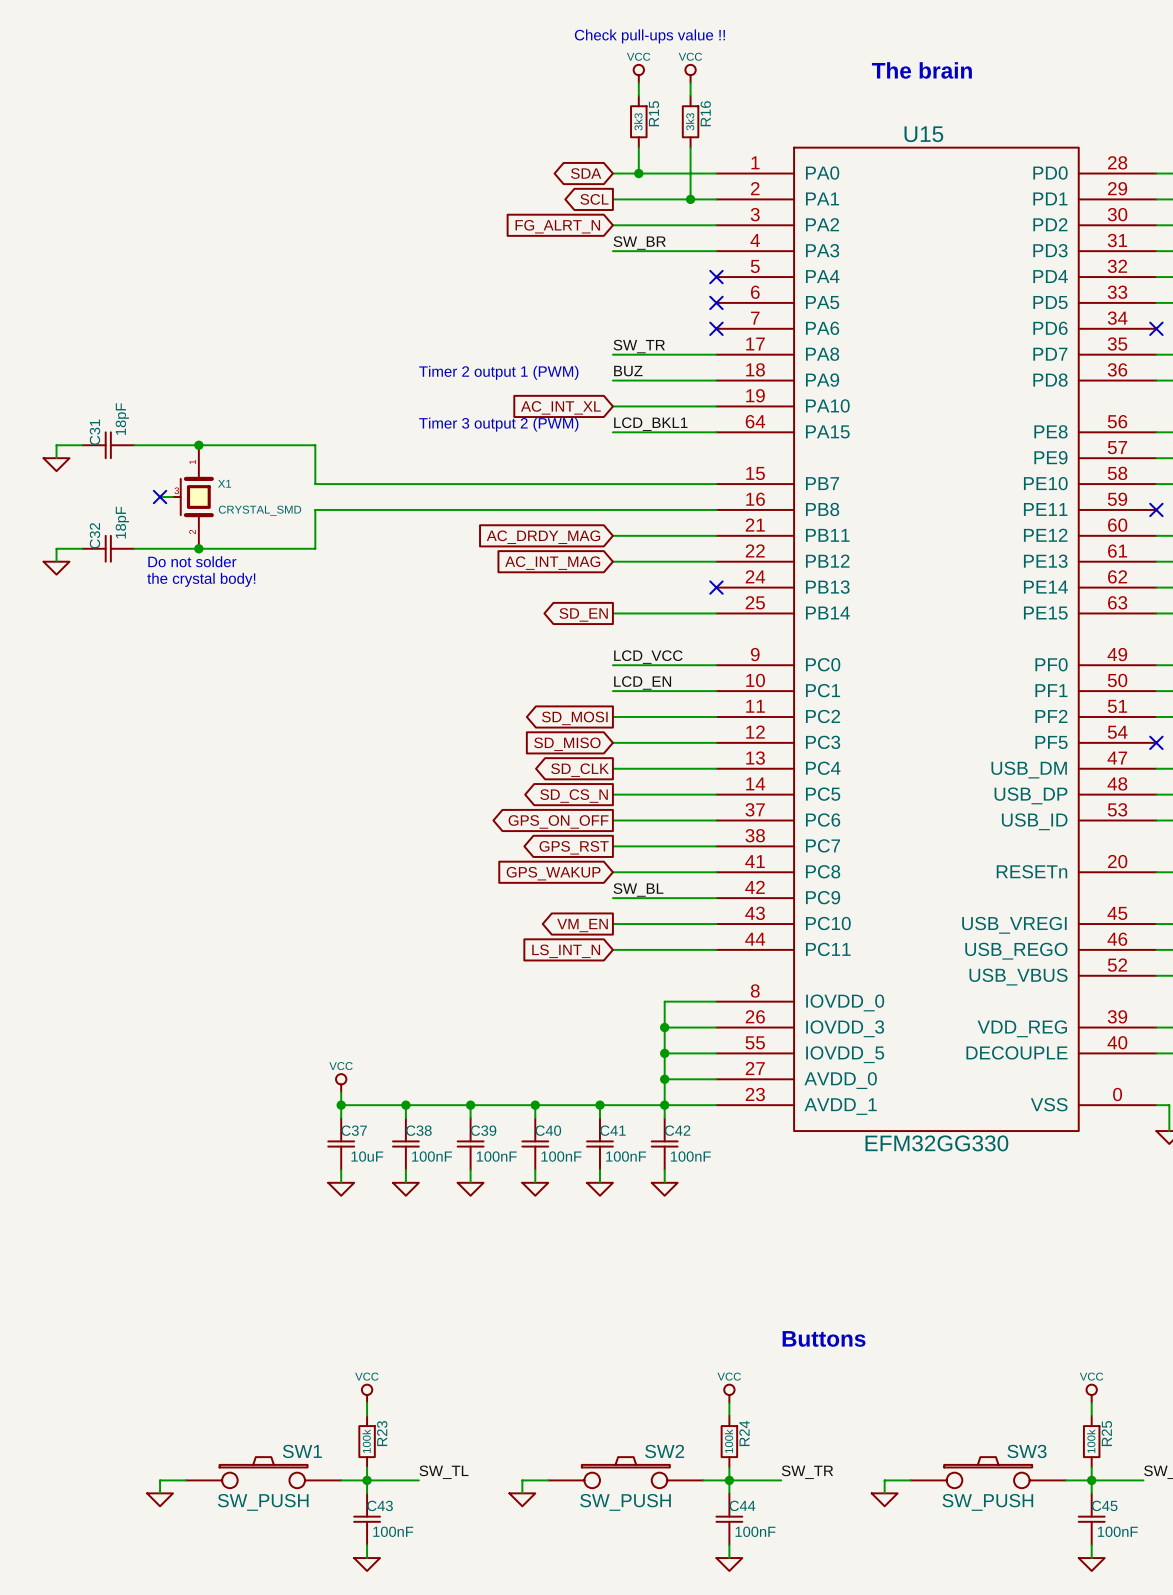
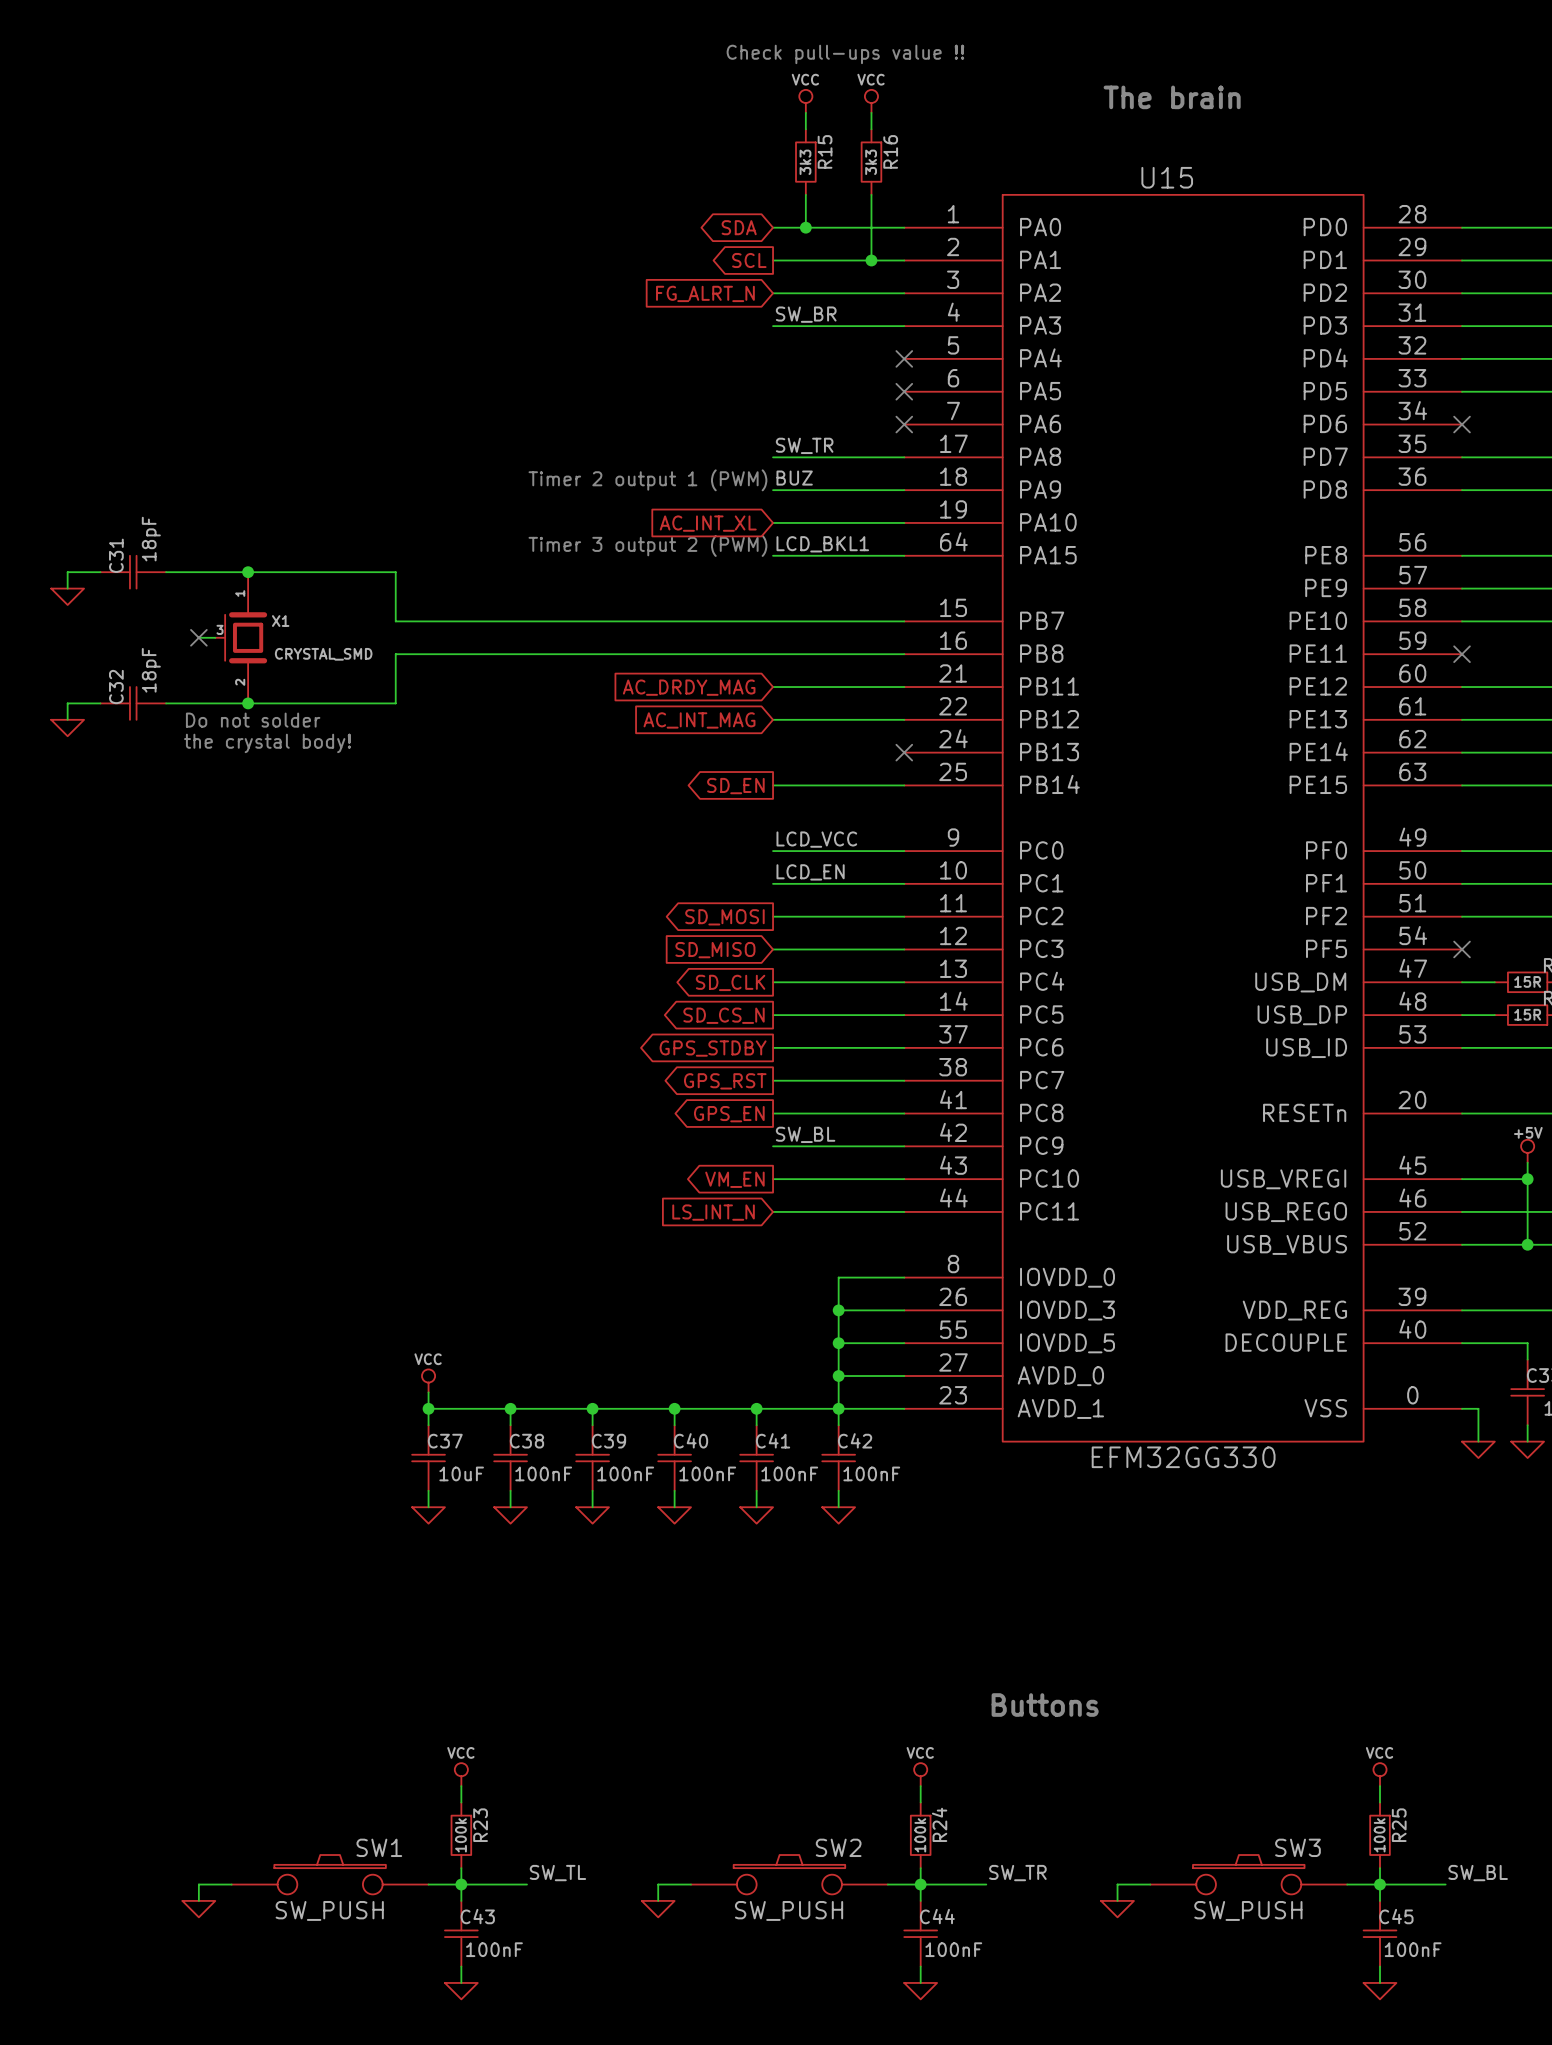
global label: GPS_ON_OFF (558, 821) -> GPS_STDBY (713, 1048)
global label shape: input (553, 873) -> output (729, 1114)
global label: GPS_WAKUP (553, 873) -> GPS_EN (729, 1114)

